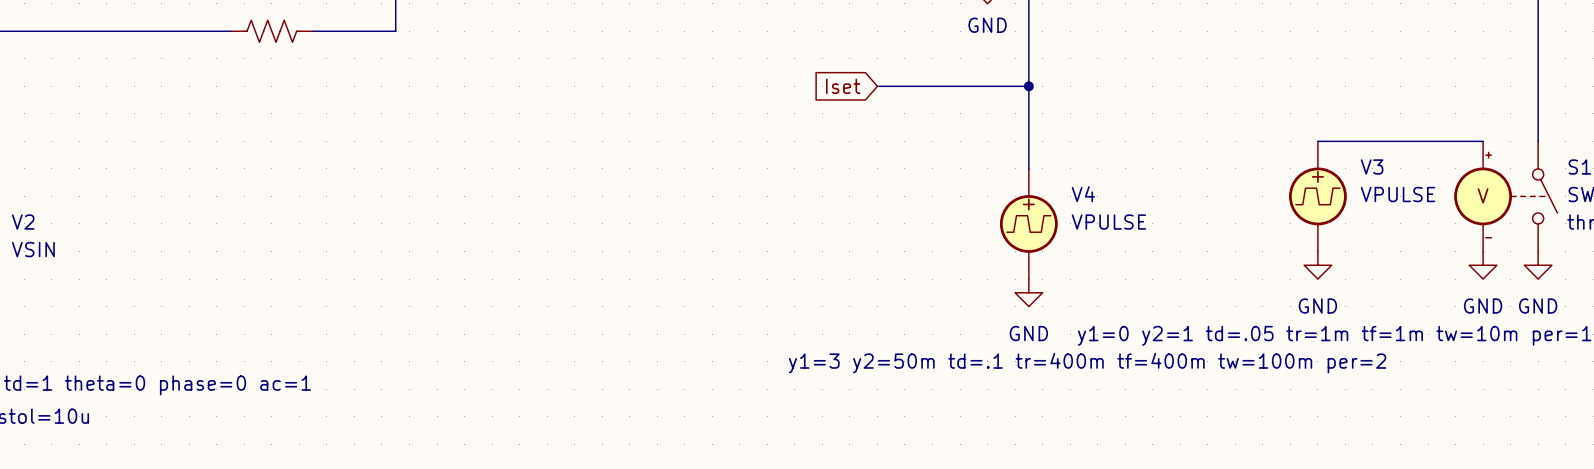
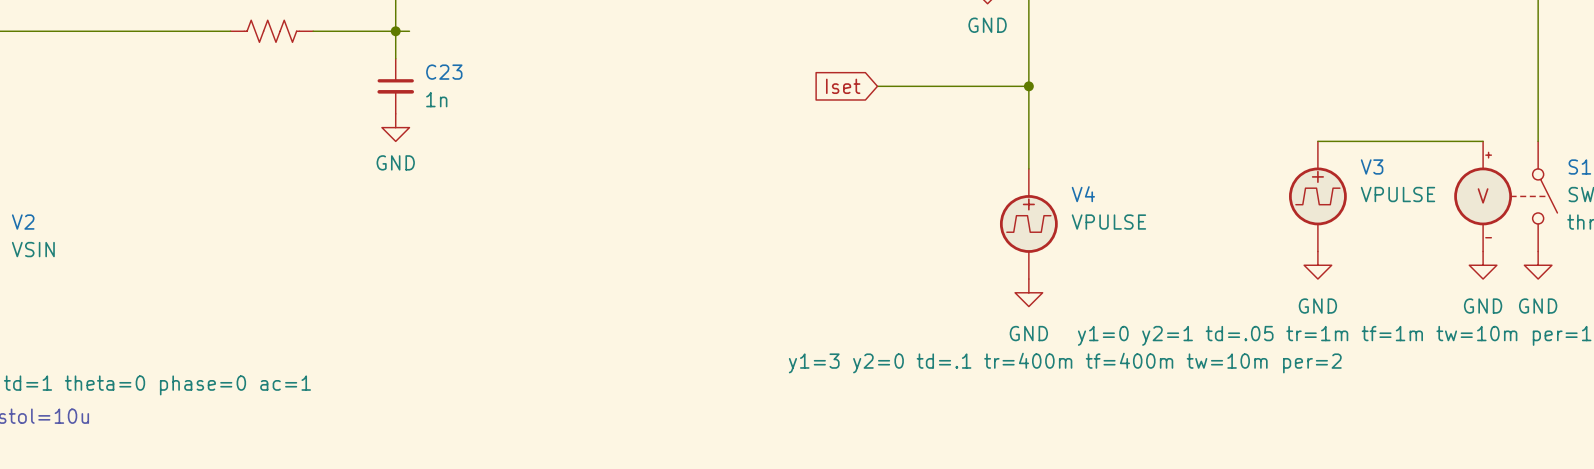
junction: none -> (395, 31)
wire: none -> (409, 31) (395, 31) (395, 58)
C23: none -> 1n (395, 86)
power symbol: none -> GND (395, 127)
V4 text: y1=3 y2=50m td=.1 tr=400m tf=400m tw=100m per=2 (1087, 363) -> y1=3 y2=0 td=.1 tr=400m tf=400m tw=10m per=2 (1065, 363)

